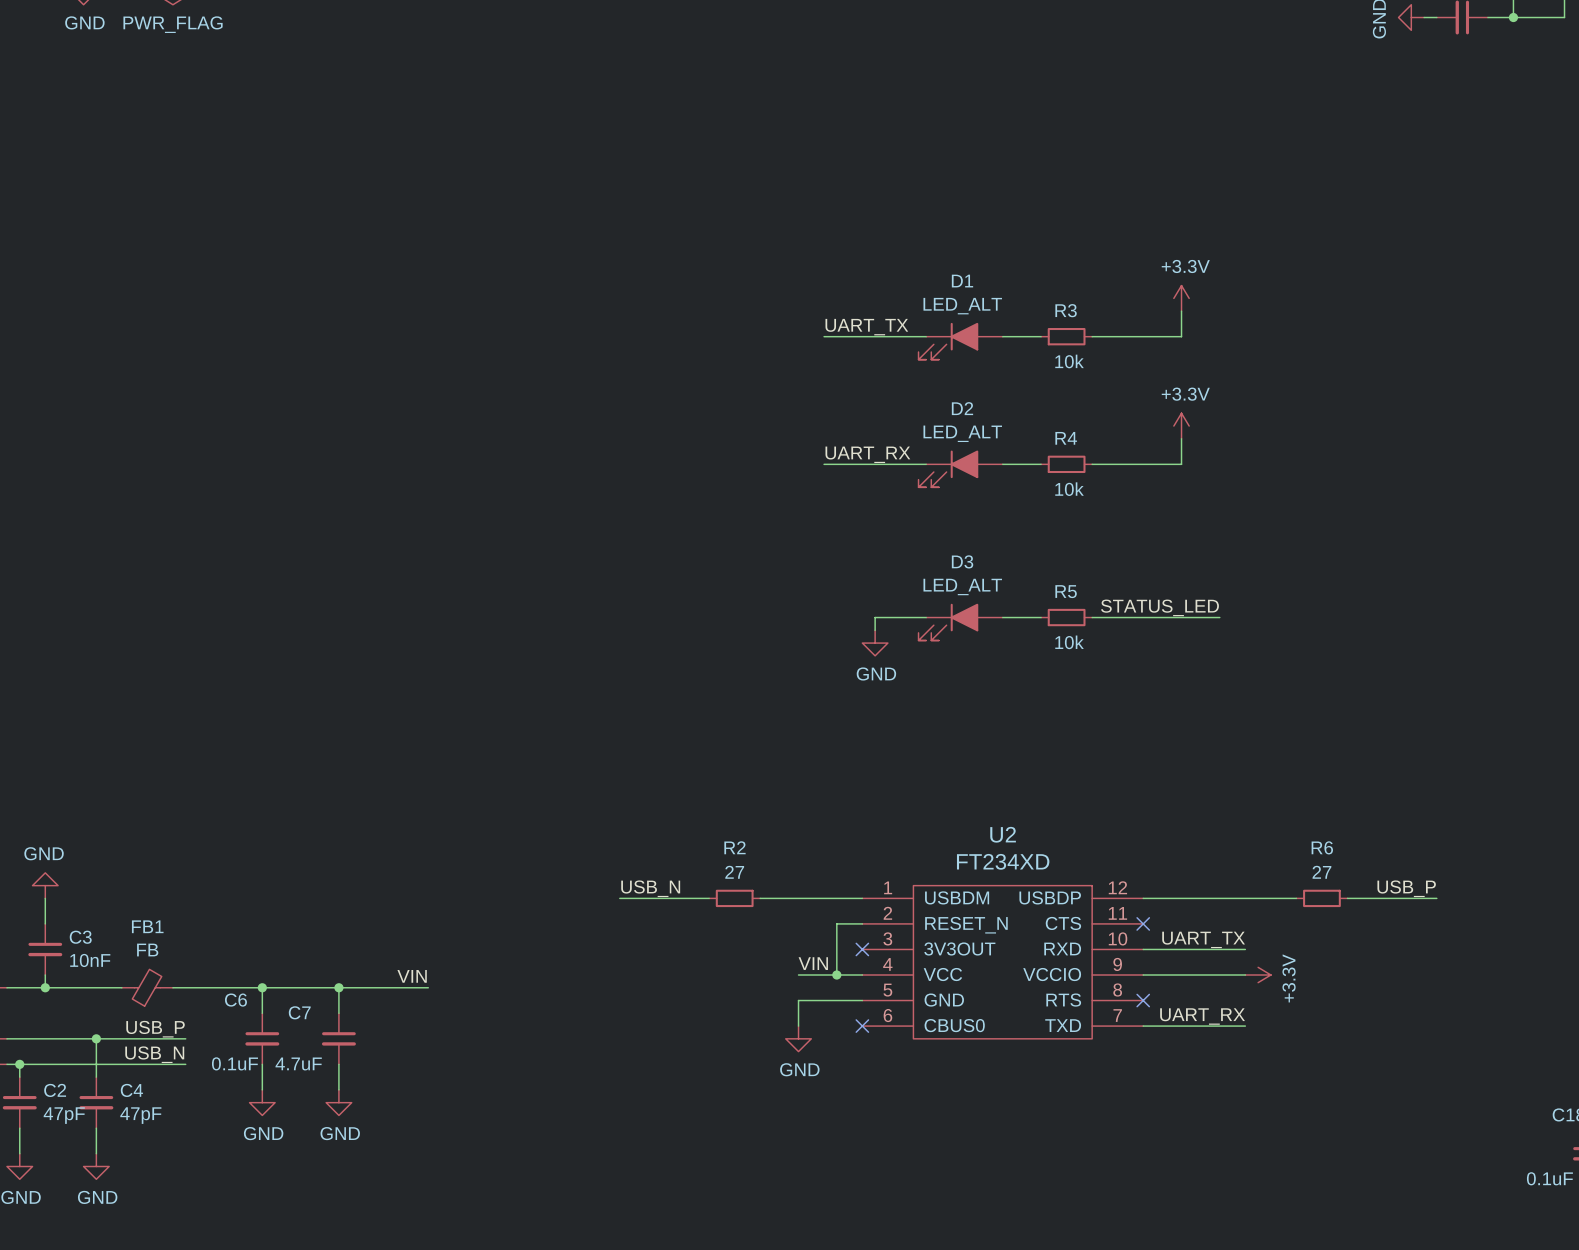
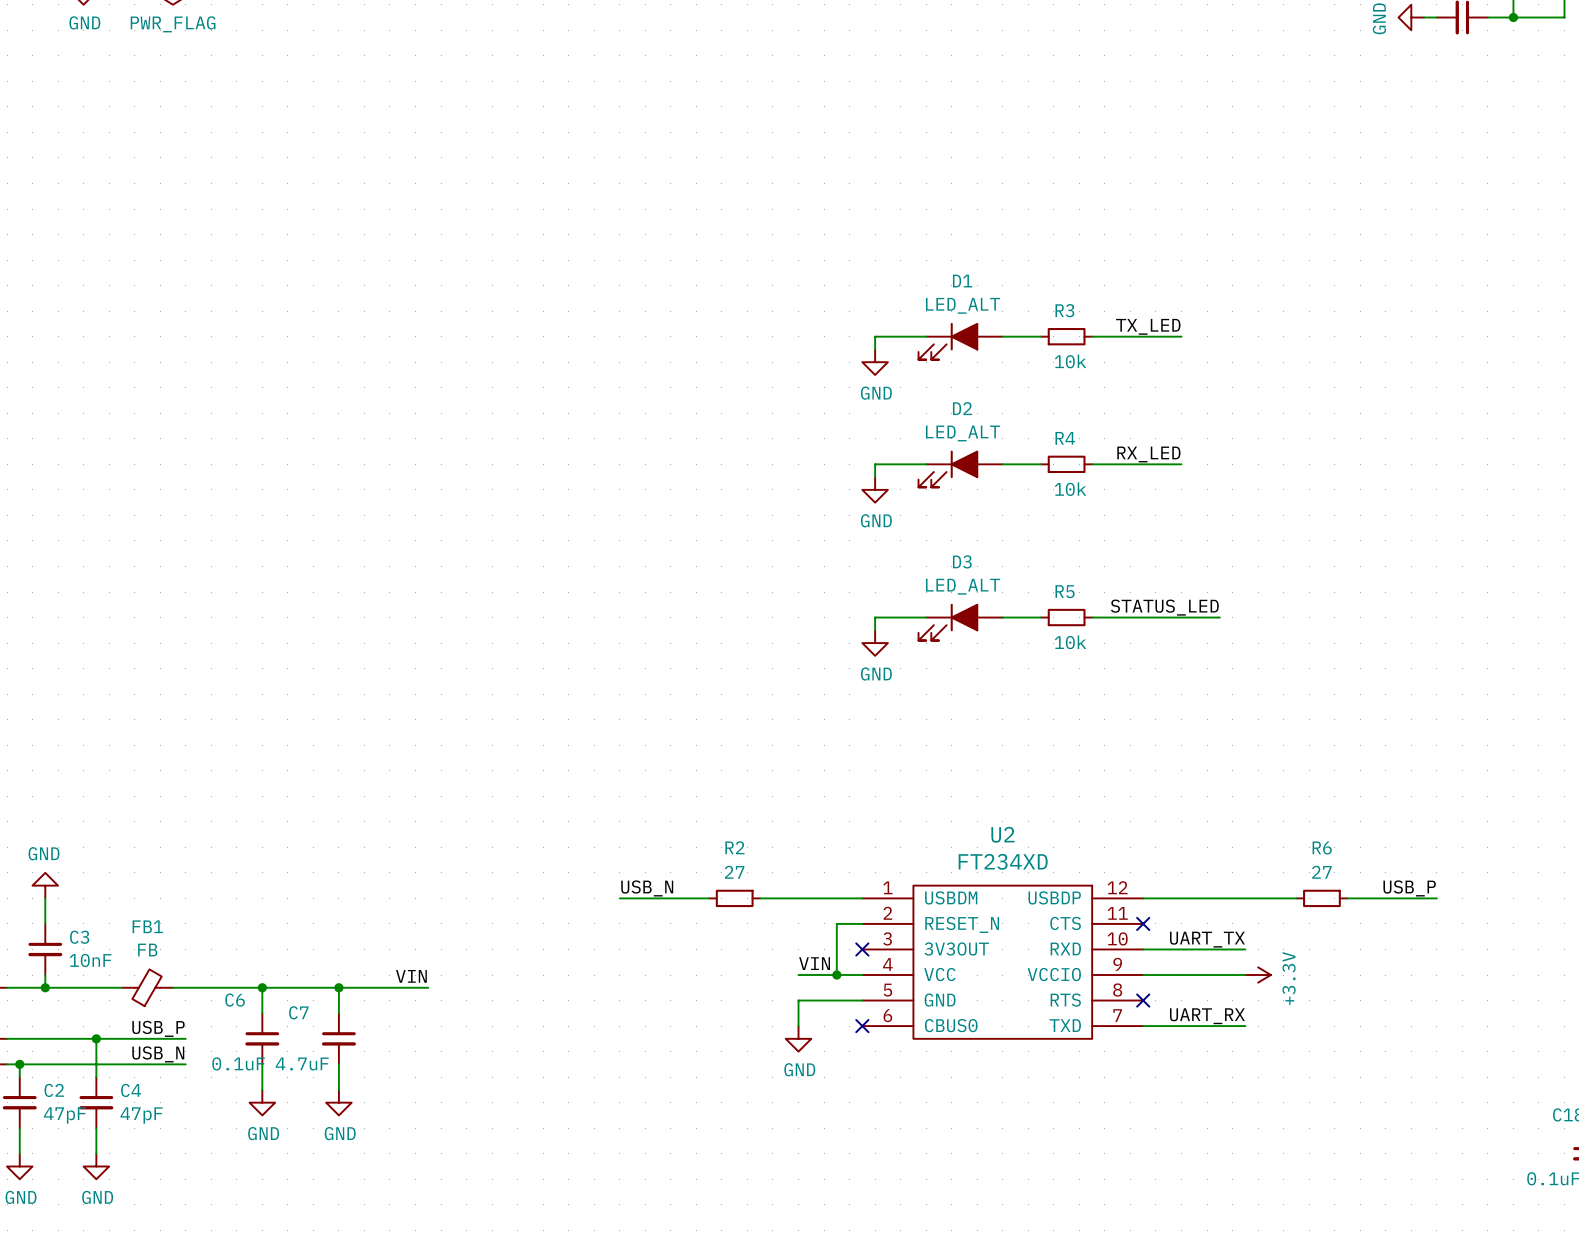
power symbol: +3.3V (1181, 298) -> none
wire: (1181, 311) (1181, 336) -> none
label: UART_TX (866, 327) -> none
label: none -> TX_LED (1148, 326)
wire: (824, 336) (875, 336) -> (875, 349) (875, 336)
power symbol: none -> GND (875, 362)
power symbol: +3.3V (1181, 426) -> none
wire: (1181, 438) (1181, 464) -> none
label: UART_RX (867, 454) -> none
label: none -> RX_LED (1148, 454)
wire: (824, 464) (875, 464) -> (875, 477) (875, 464)
power symbol: none -> GND (875, 489)

